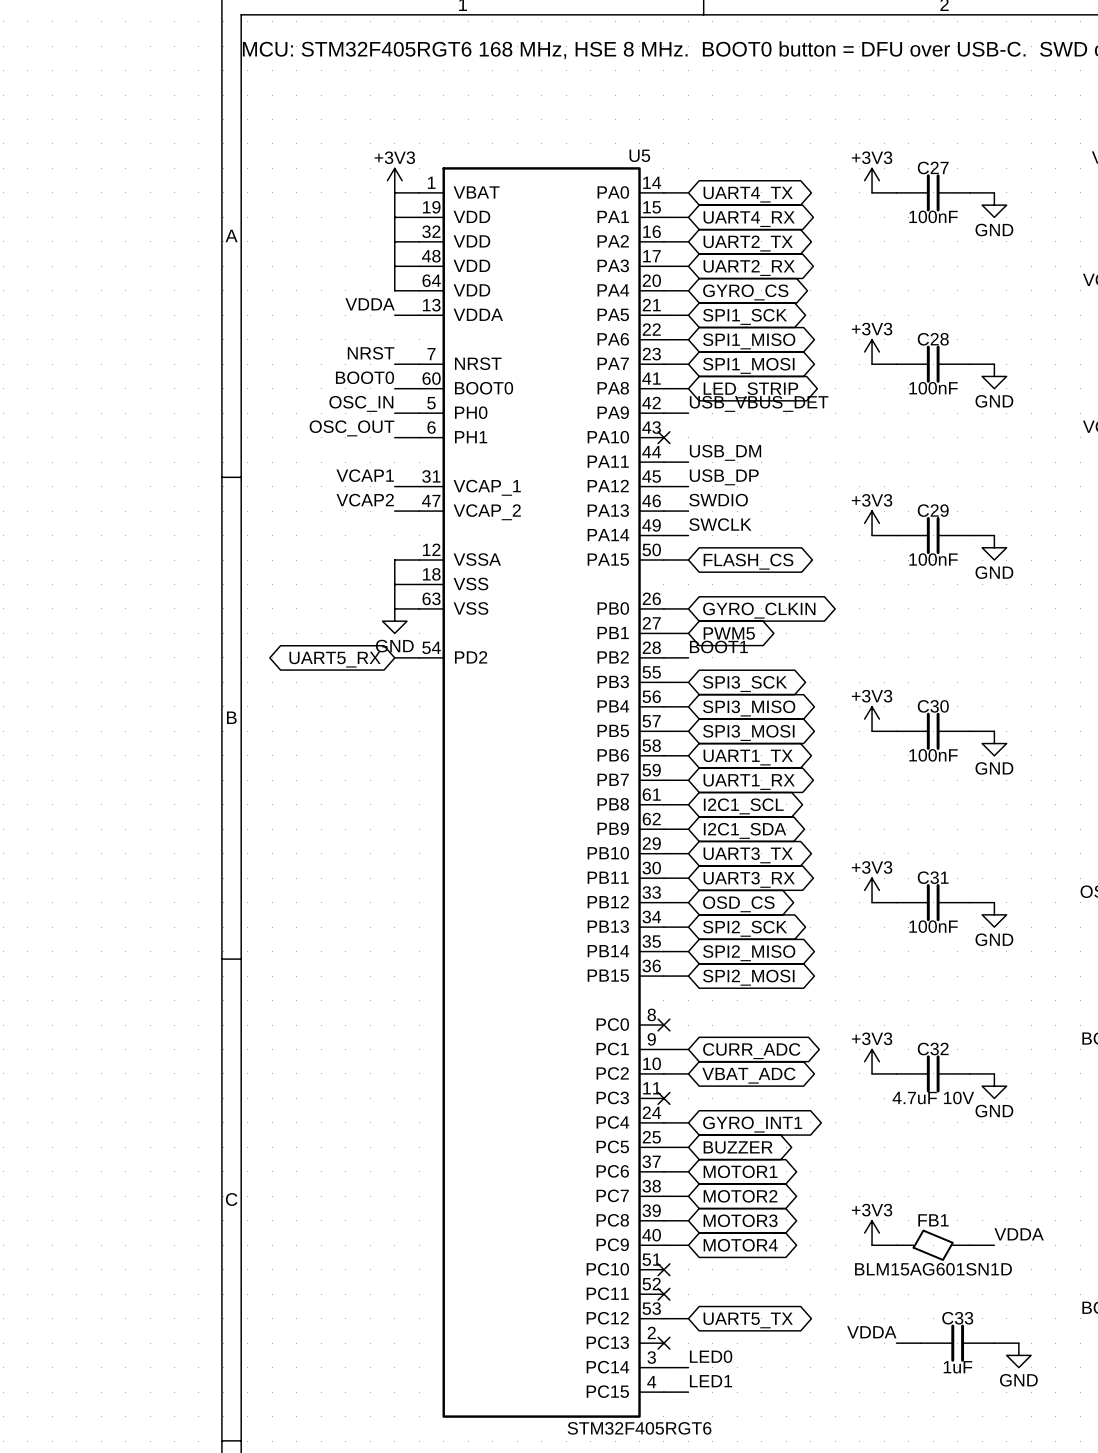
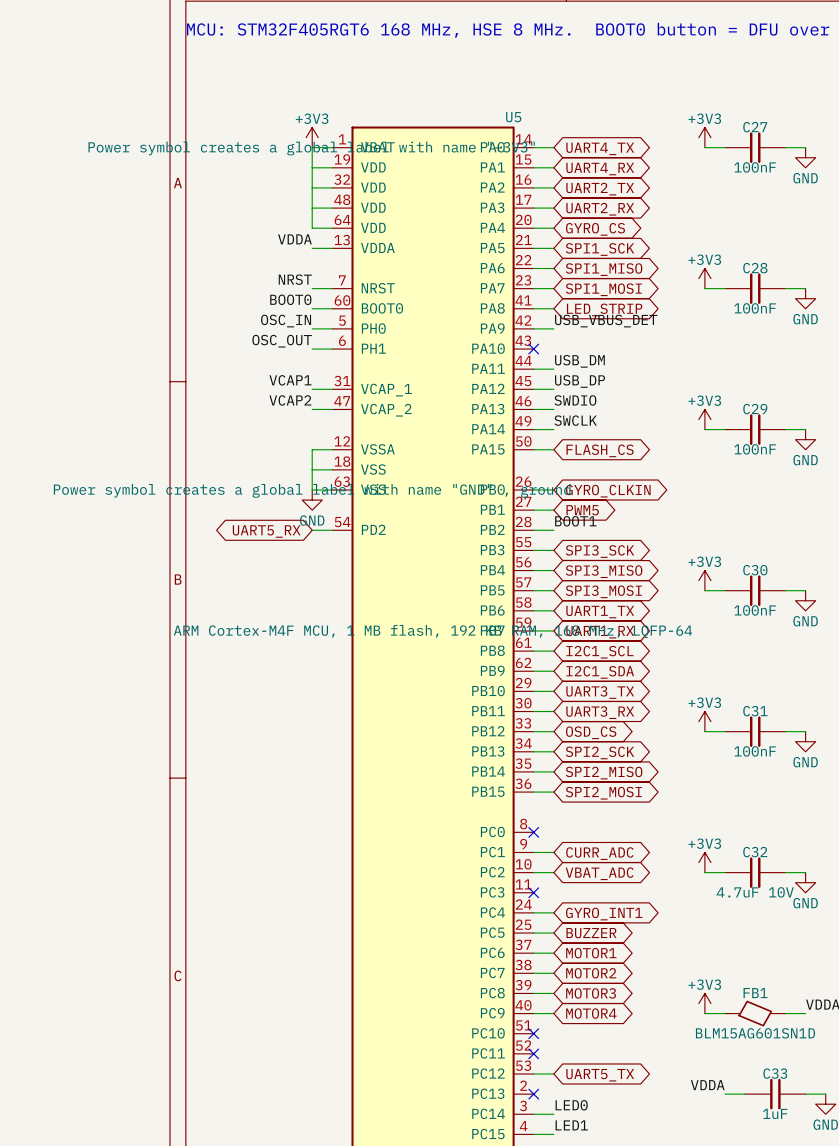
power symbol text: none -> Power symbol creates a global label with name "+3V3" (311, 148)
power symbol text: none -> Power symbol creates a global label with name "GND" , ground (312, 490)
U5 text: none -> ARM Cortex-M4F MCU, 1 MB flash, 192 KB RAM, 168 MHz, LQFP-64 (433, 631)

